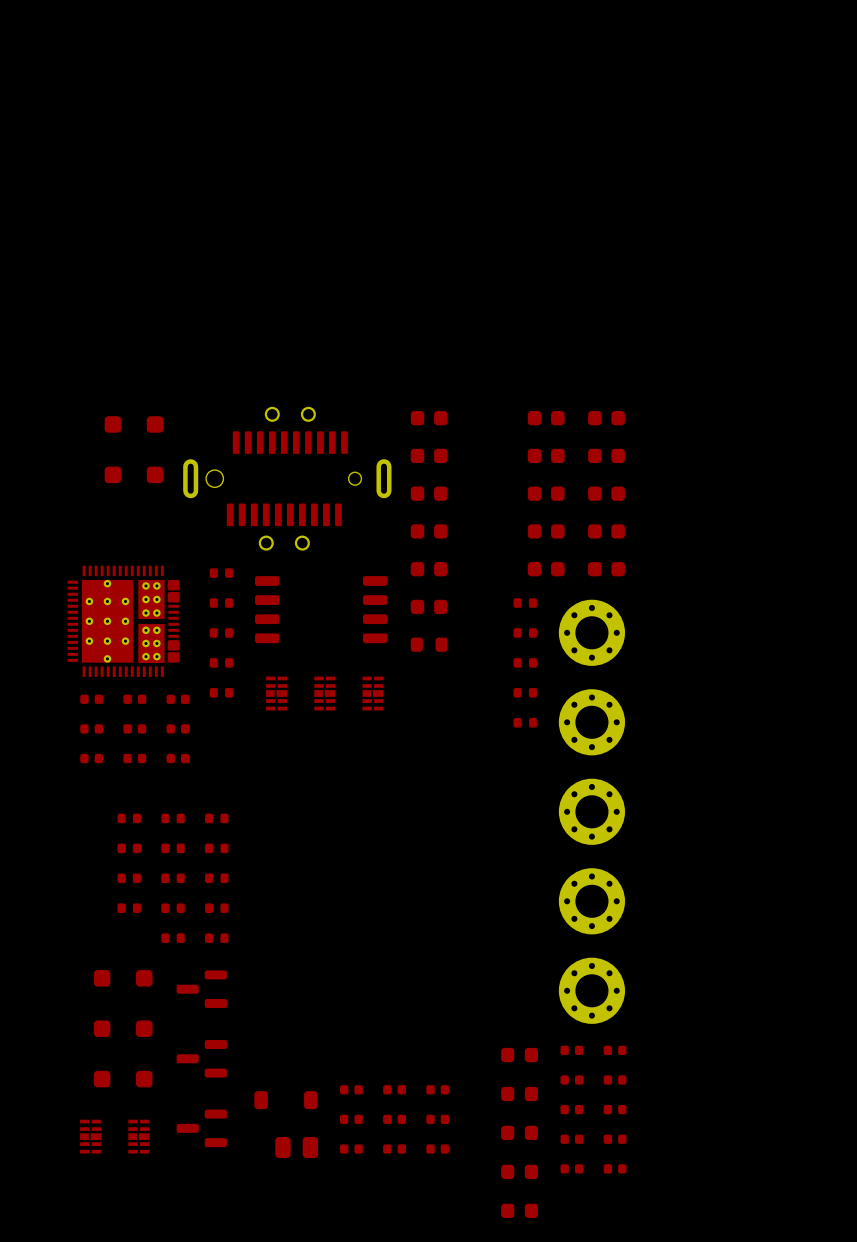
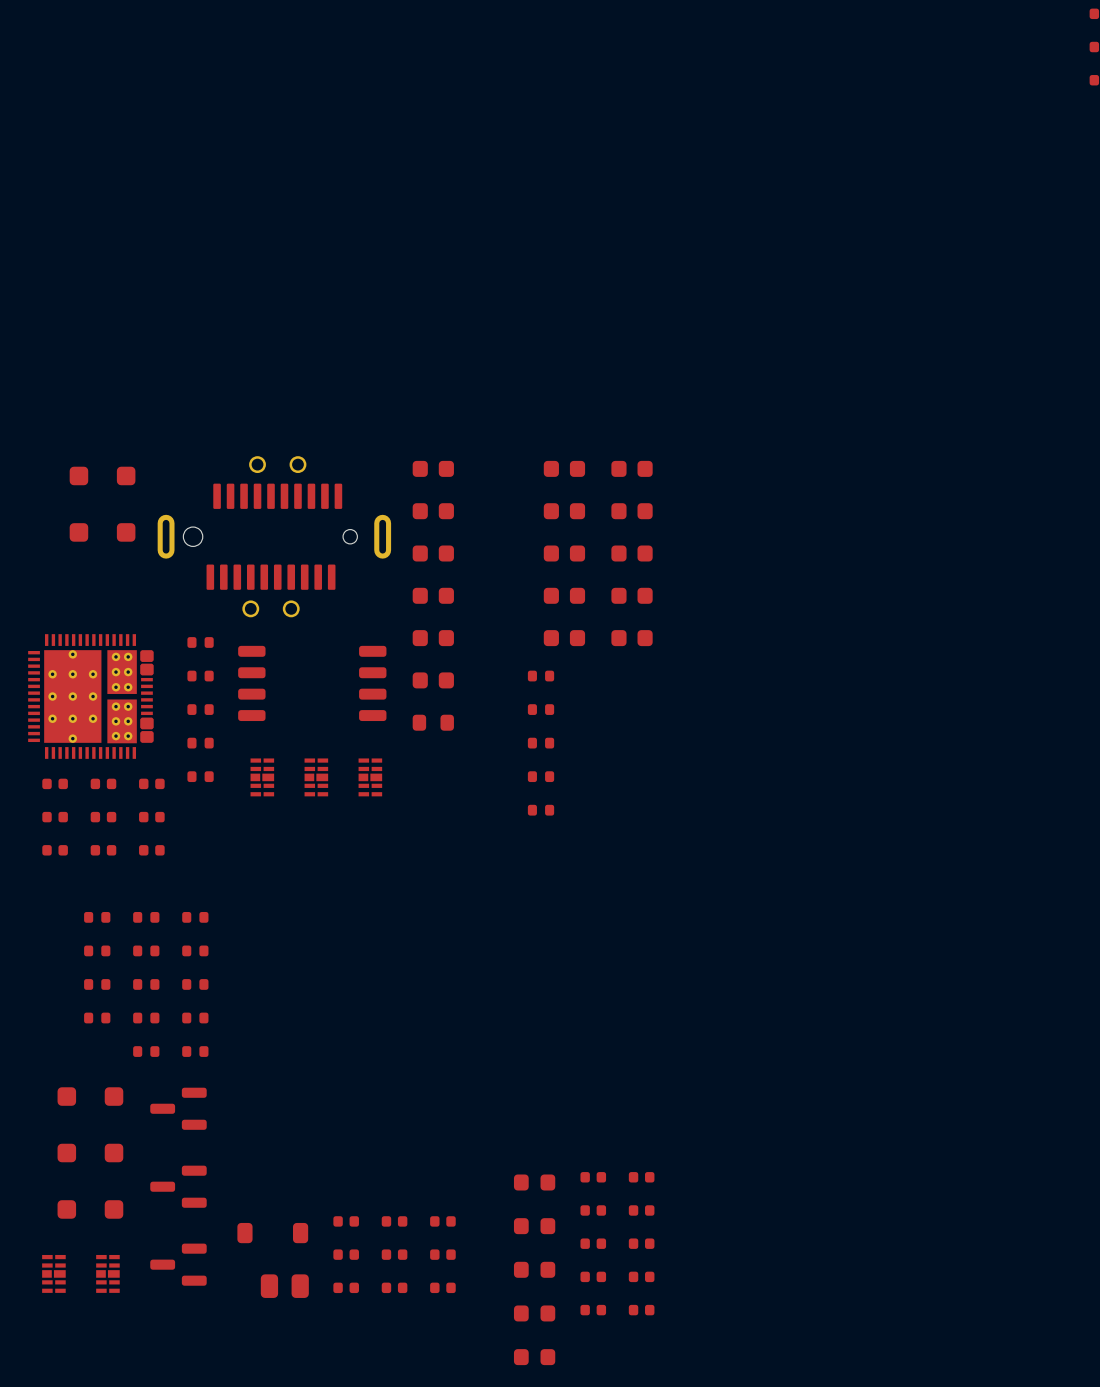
part: (591, 632) -> none
part: (591, 722) -> none
part: (591, 811) -> none
part: (591, 901) -> none
part: (591, 990) -> none

